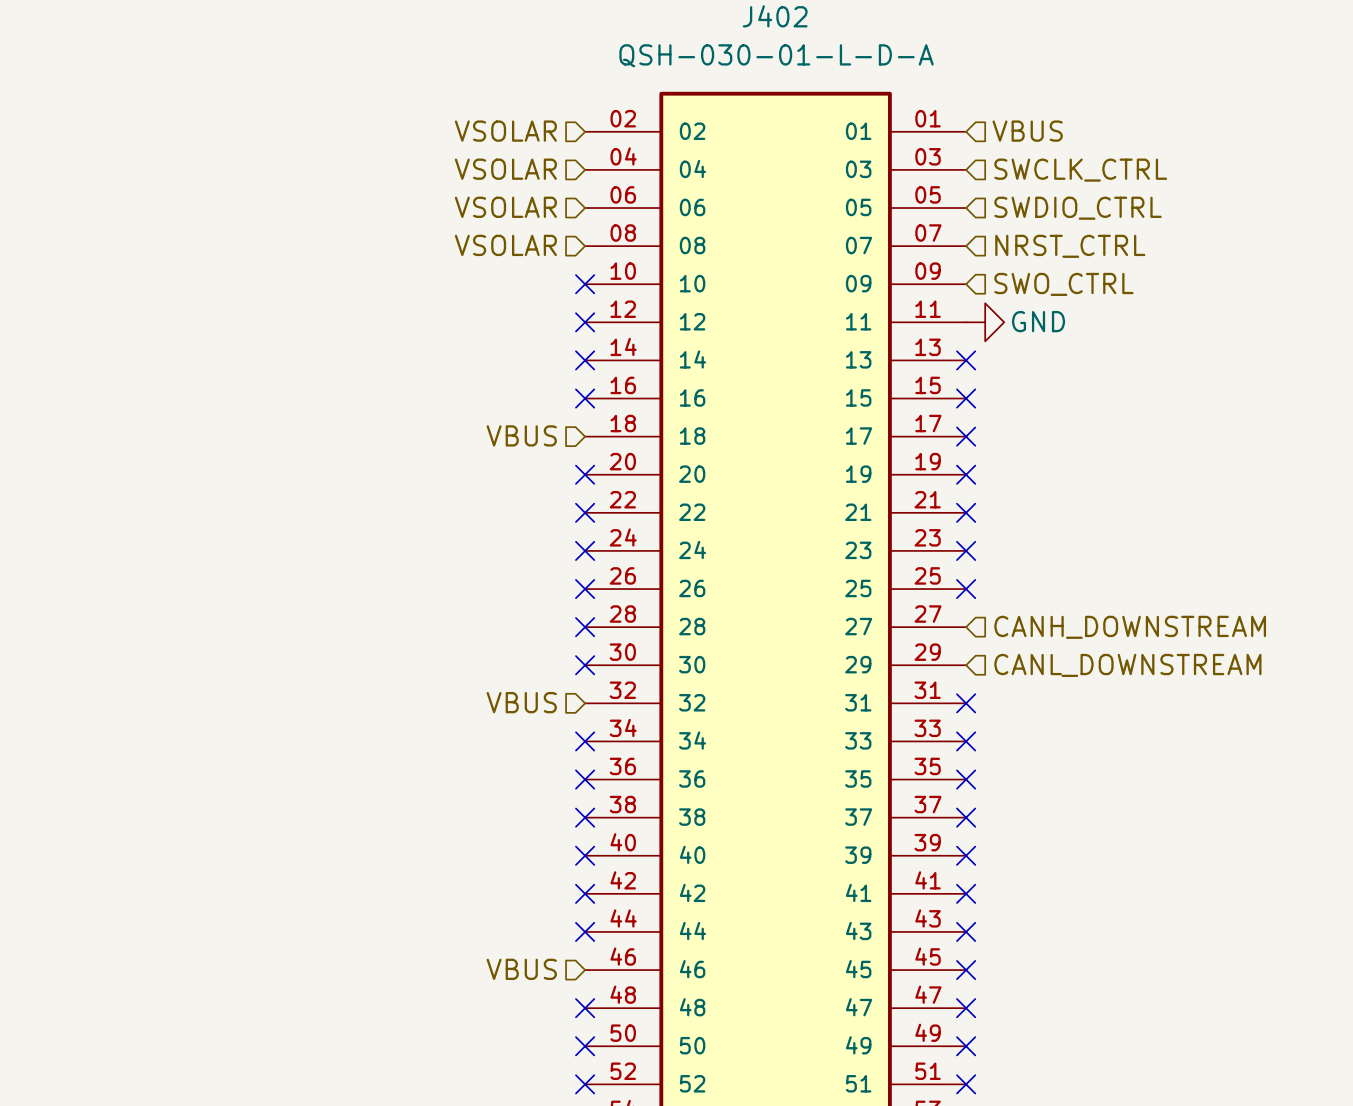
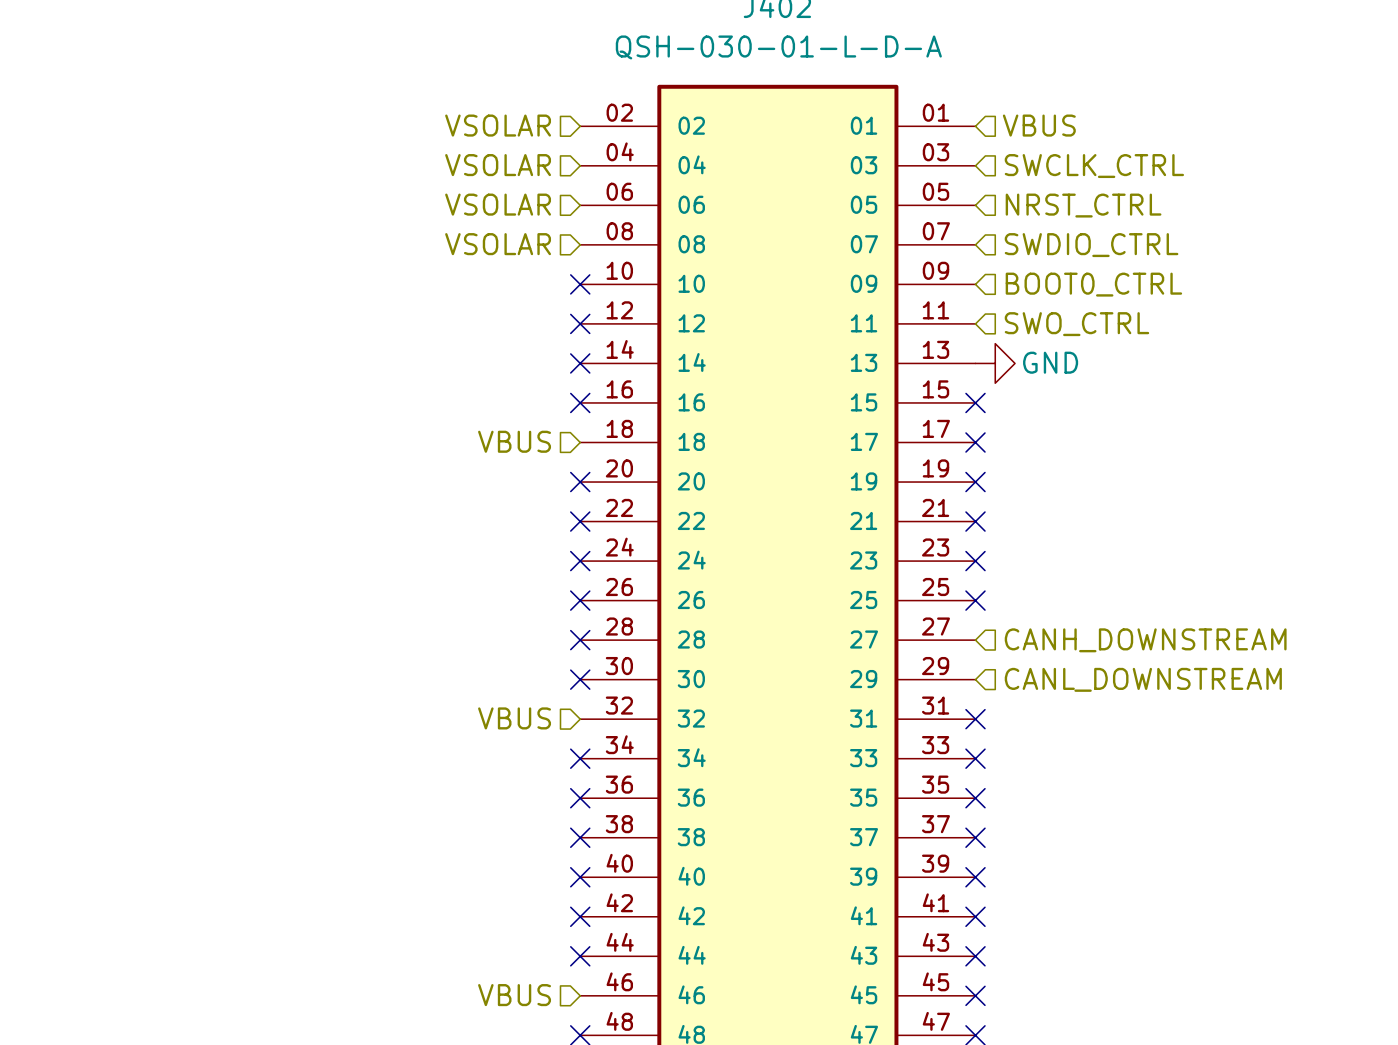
hierarchical label: SWDIO_CTRL (1078, 208) -> NRST_CTRL (1083, 205)
hierarchical label: NRST_CTRL (1070, 246) -> SWDIO_CTRL (1091, 245)
hierarchical label: SWO_CTRL (1063, 284) -> BOOT0_CTRL (1093, 284)
power symbol position: GND (985, 322) -> GND (995, 363)
hierarchical label: none -> SWO_CTRL (1076, 324)
no-connect mark: (966, 360) -> none

